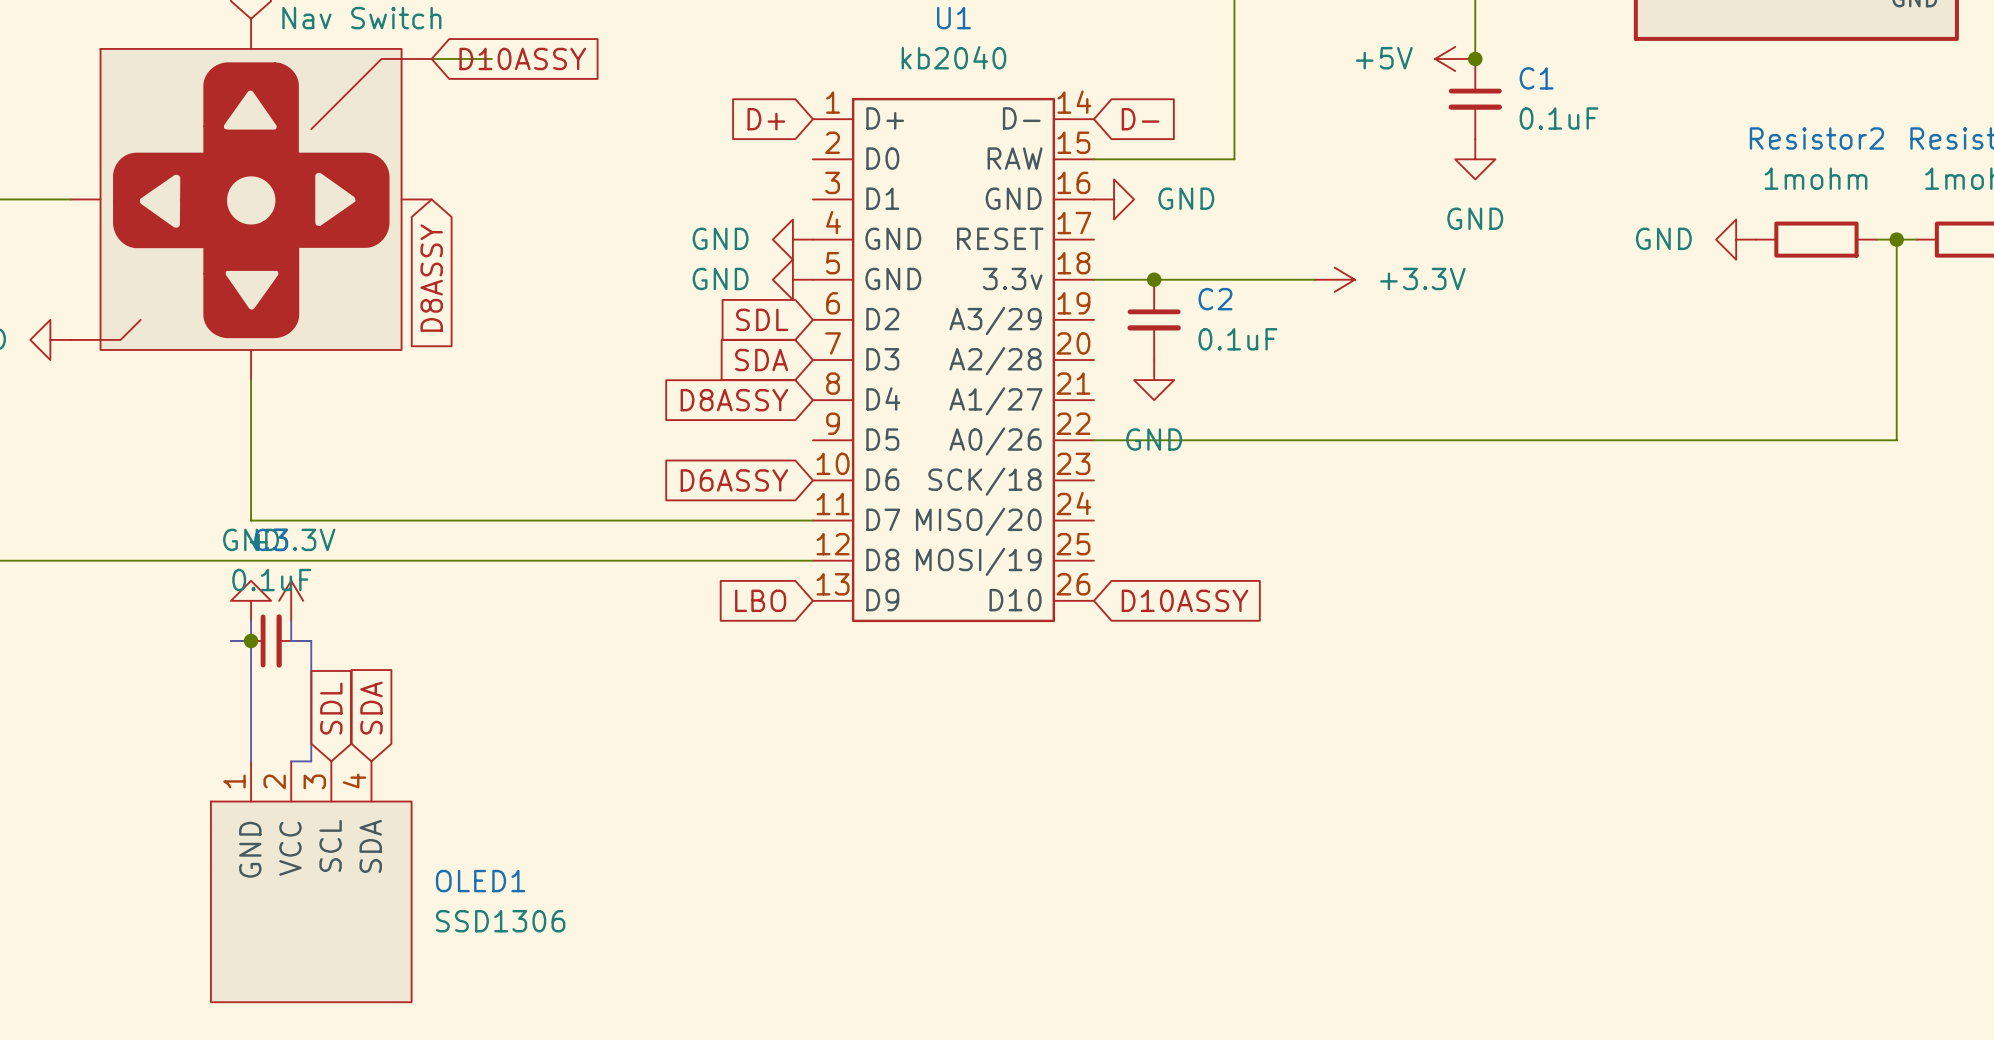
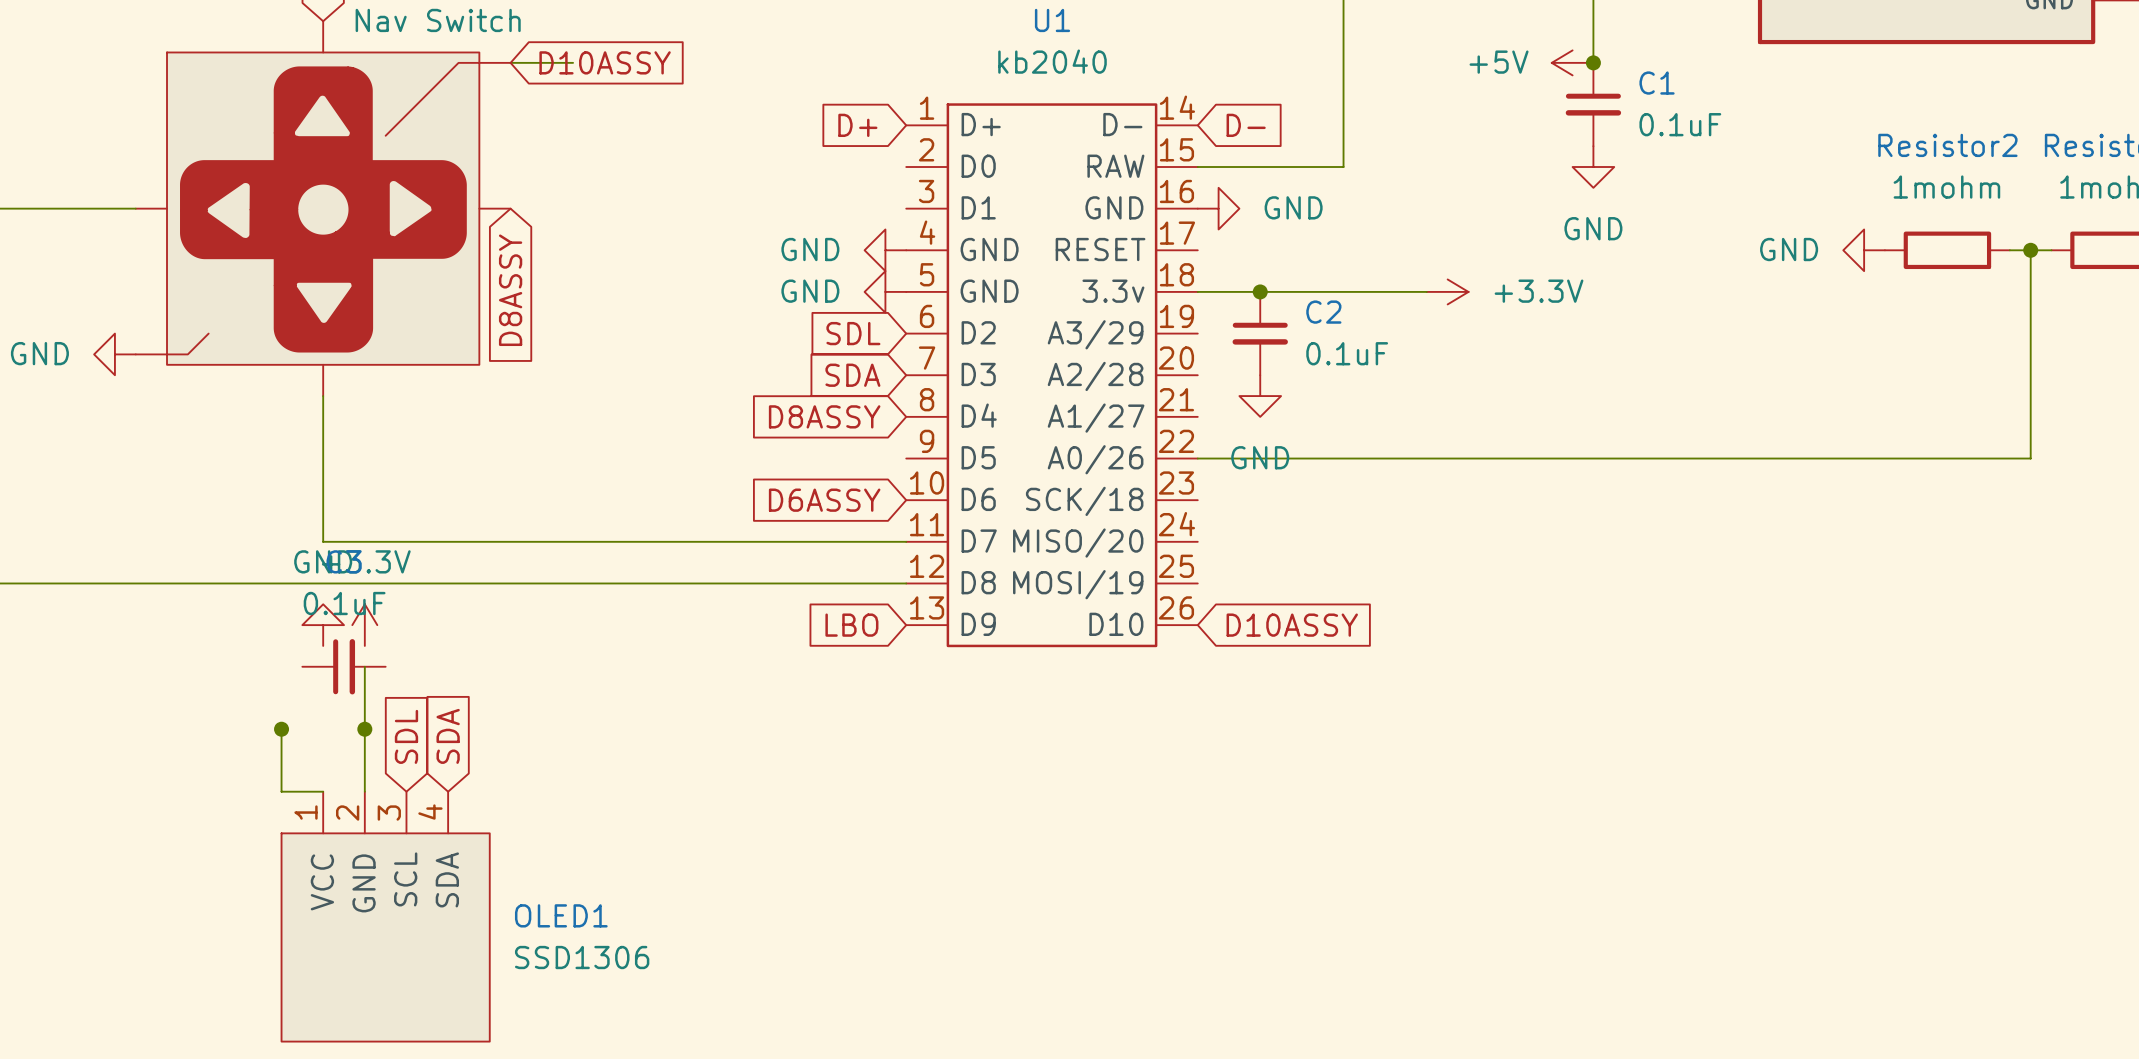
bus: (251, 620) (251, 761) -> none
bus: (291, 620) (291, 640) (311, 640) (311, 761) (291, 761) -> none
bus: (230, 640) (251, 640) -> none
junction: (251, 640) -> none
wire: none -> (364, 666) (364, 791)
wire: none -> (281, 729) (281, 791) (323, 791)
junction: none -> (281, 729)
junction: none -> (364, 729)
OLED1 pin name: VCC (290, 848) -> GND (364, 883)
OLED1 pin name: GND (250, 849) -> VCC (322, 882)

